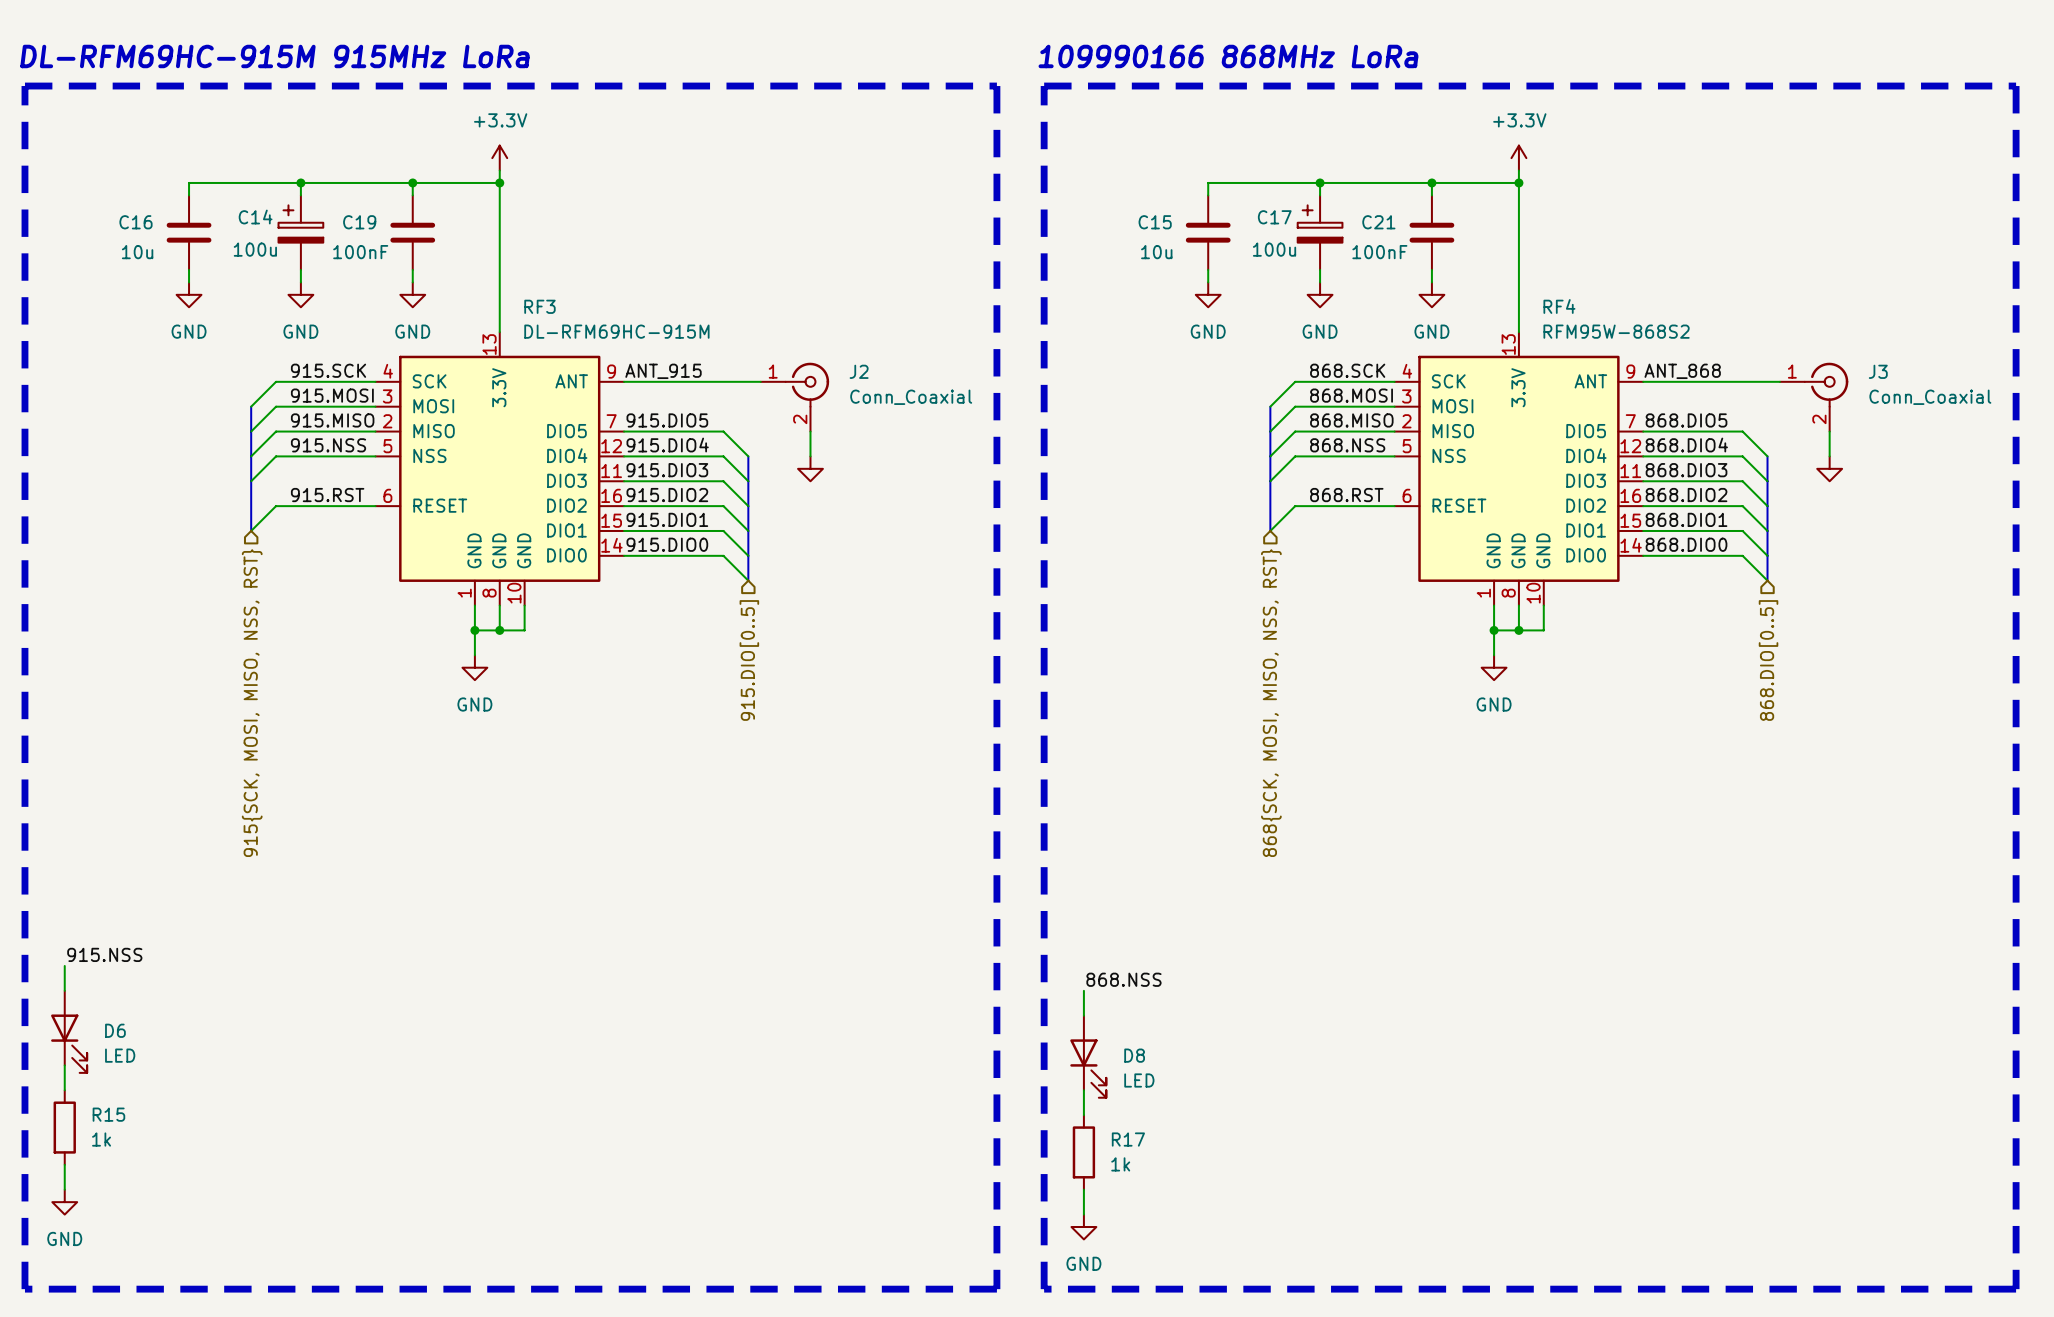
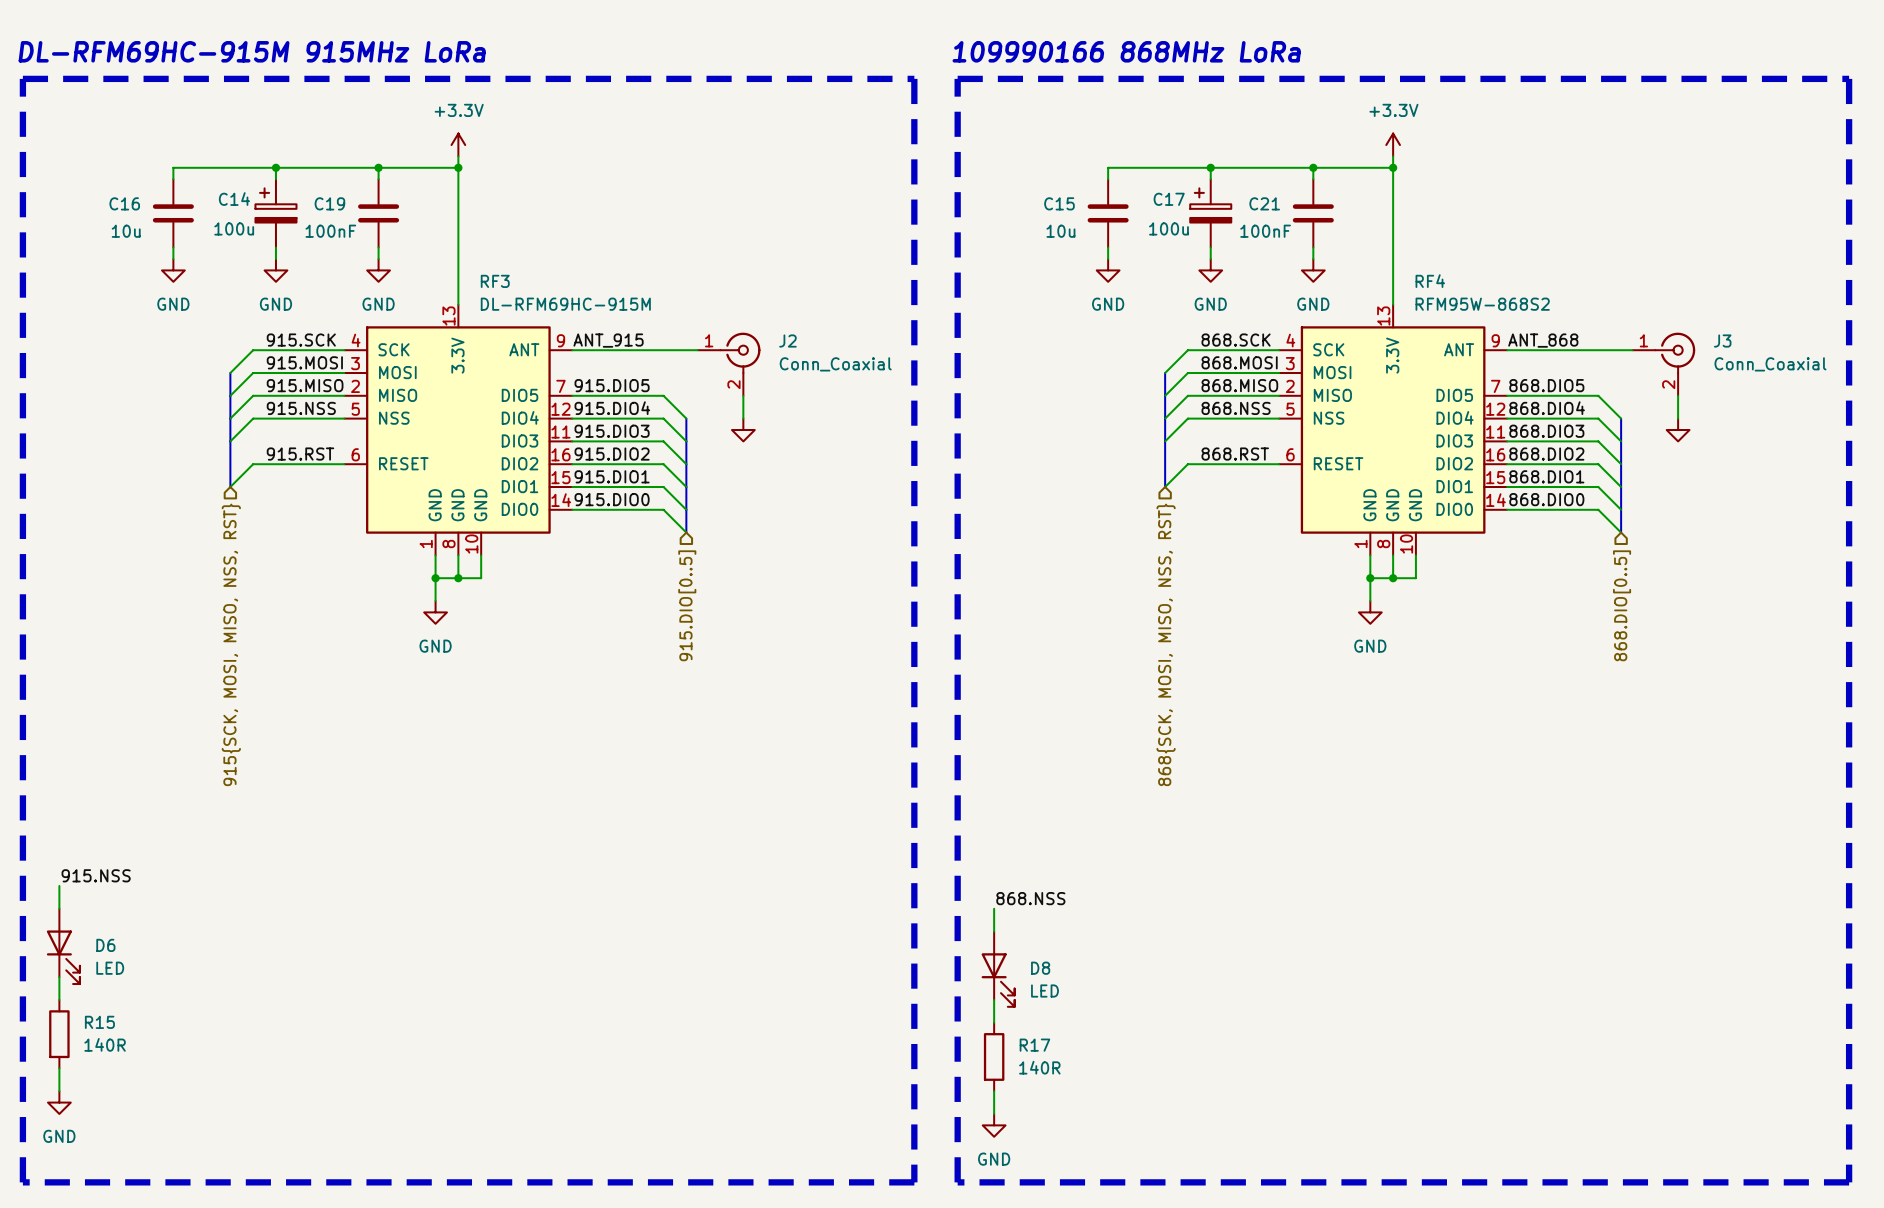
R15 value: 1k (101, 1139) -> 140R (105, 1044)
R17 value: 1k (1120, 1164) -> 140R (1039, 1067)

